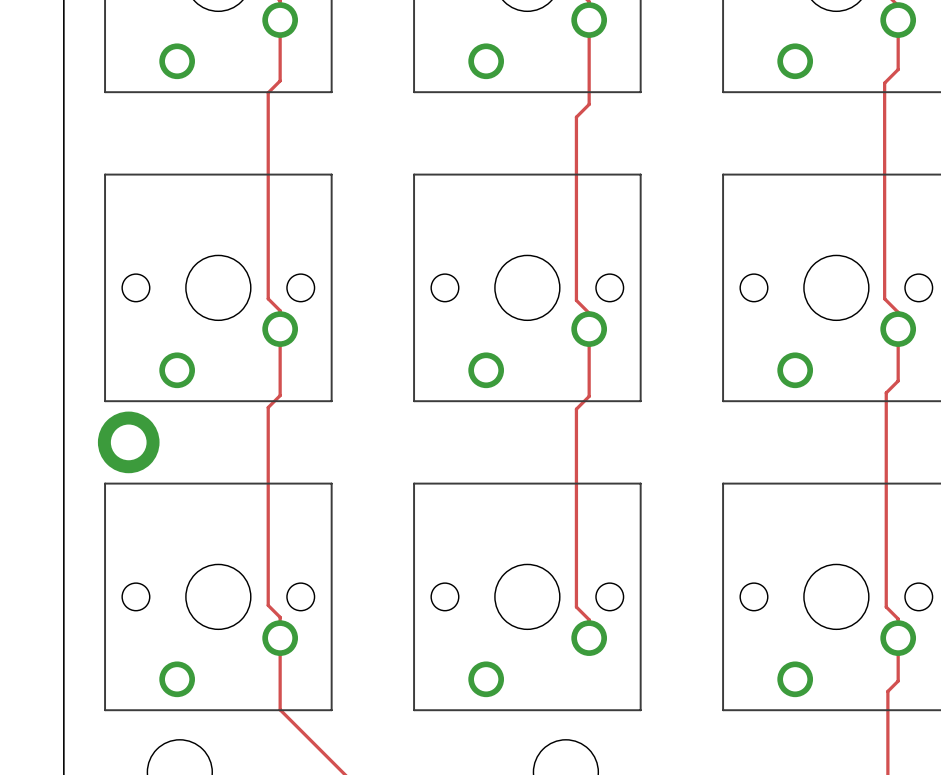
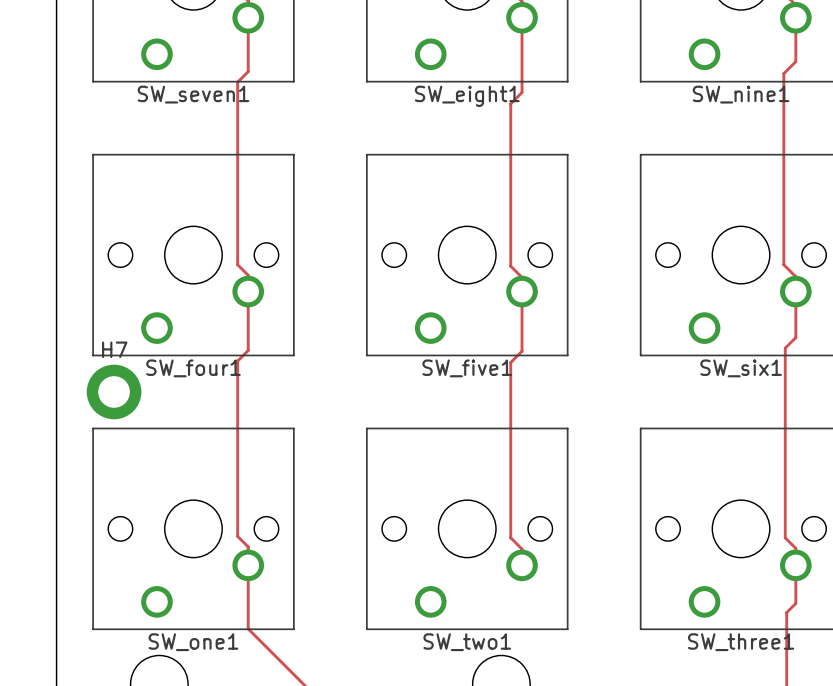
SW_seven1 name: none -> SW_seven1 (193, 94)
SW_nine1 name: none -> SW_nine1 (741, 94)
SW_eight1 name: none -> SW_eight1 (467, 96)
H7 name: none -> H7 (114, 349)
SW_four1 name: none -> SW_four1 (193, 368)
SW_five1 name: none -> SW_five1 (467, 368)
SW_six1 name: none -> SW_six1 (741, 368)
SW_one1 name: none -> SW_one1 (193, 642)
SW_two1 name: none -> SW_two1 (467, 642)
SW_three1 name: none -> SW_three1 (741, 642)

